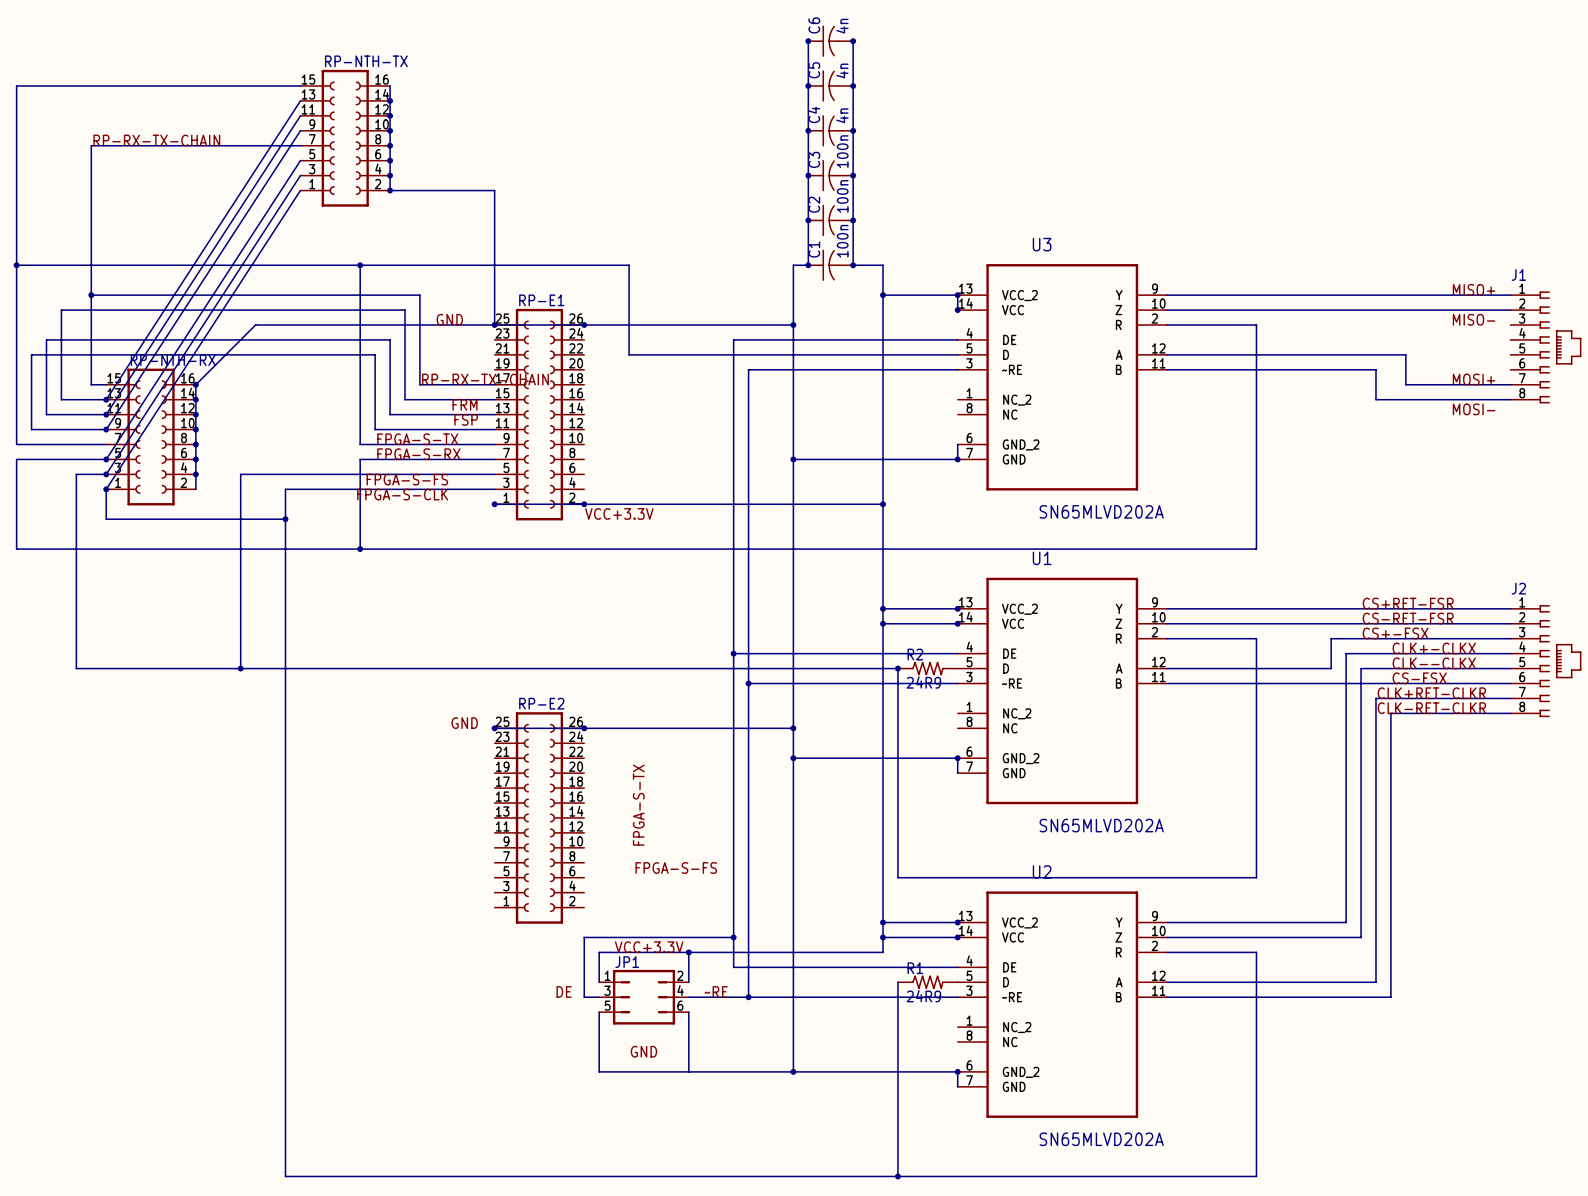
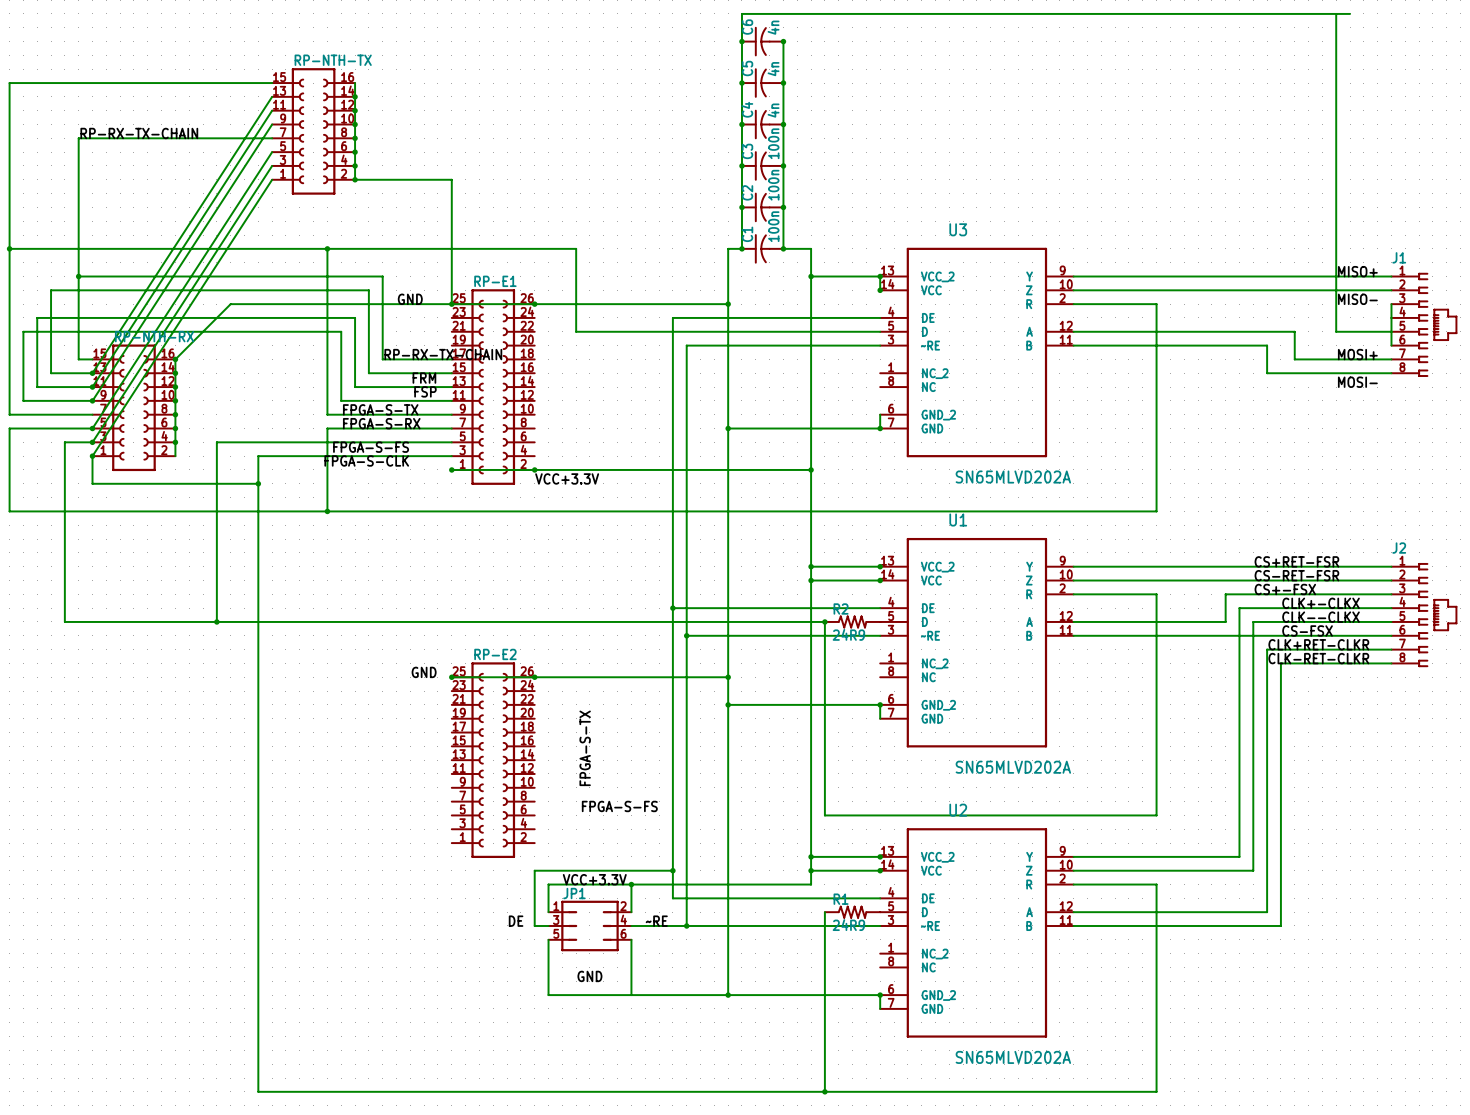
wire: none -> (1336, 13) (1336, 331) (1391, 331)
wire: none -> (1350, 13) (741, 13) (741, 41)
wire: none -> (1391, 304) (1391, 345)

